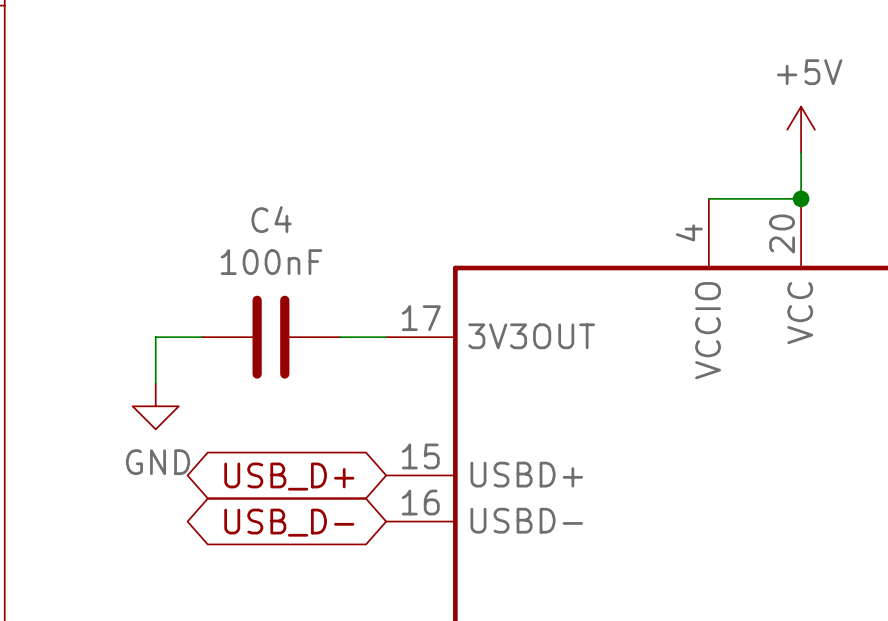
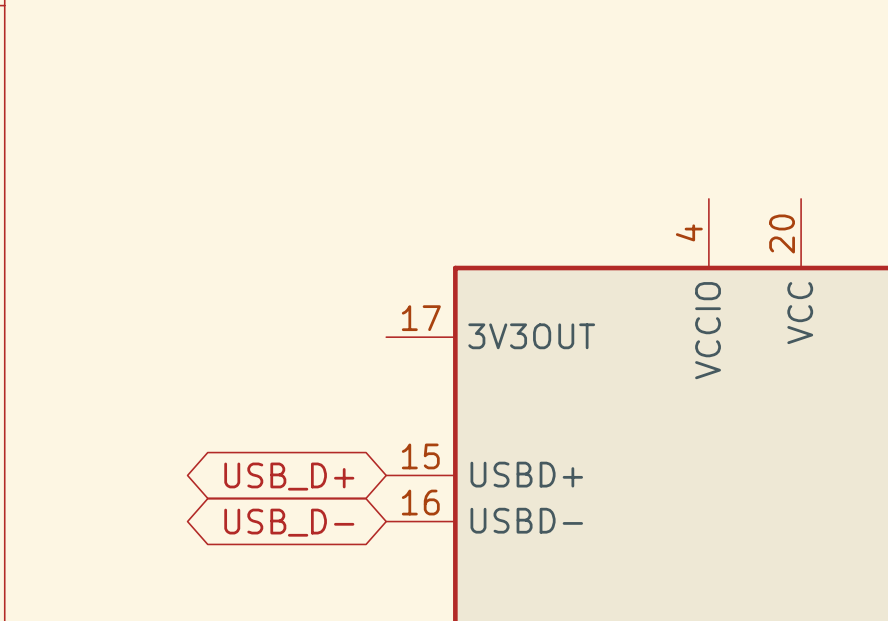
power symbol: +5V (801, 129) -> none
wire: (801, 152) (801, 198) (708, 198) -> none
junction: (801, 198) -> none
wire: (201, 337) (155, 337) (155, 383) -> none
C4: 100nF (270, 337) -> none
wire: (340, 337) (386, 337) -> none
power symbol: GND (155, 406) -> none

